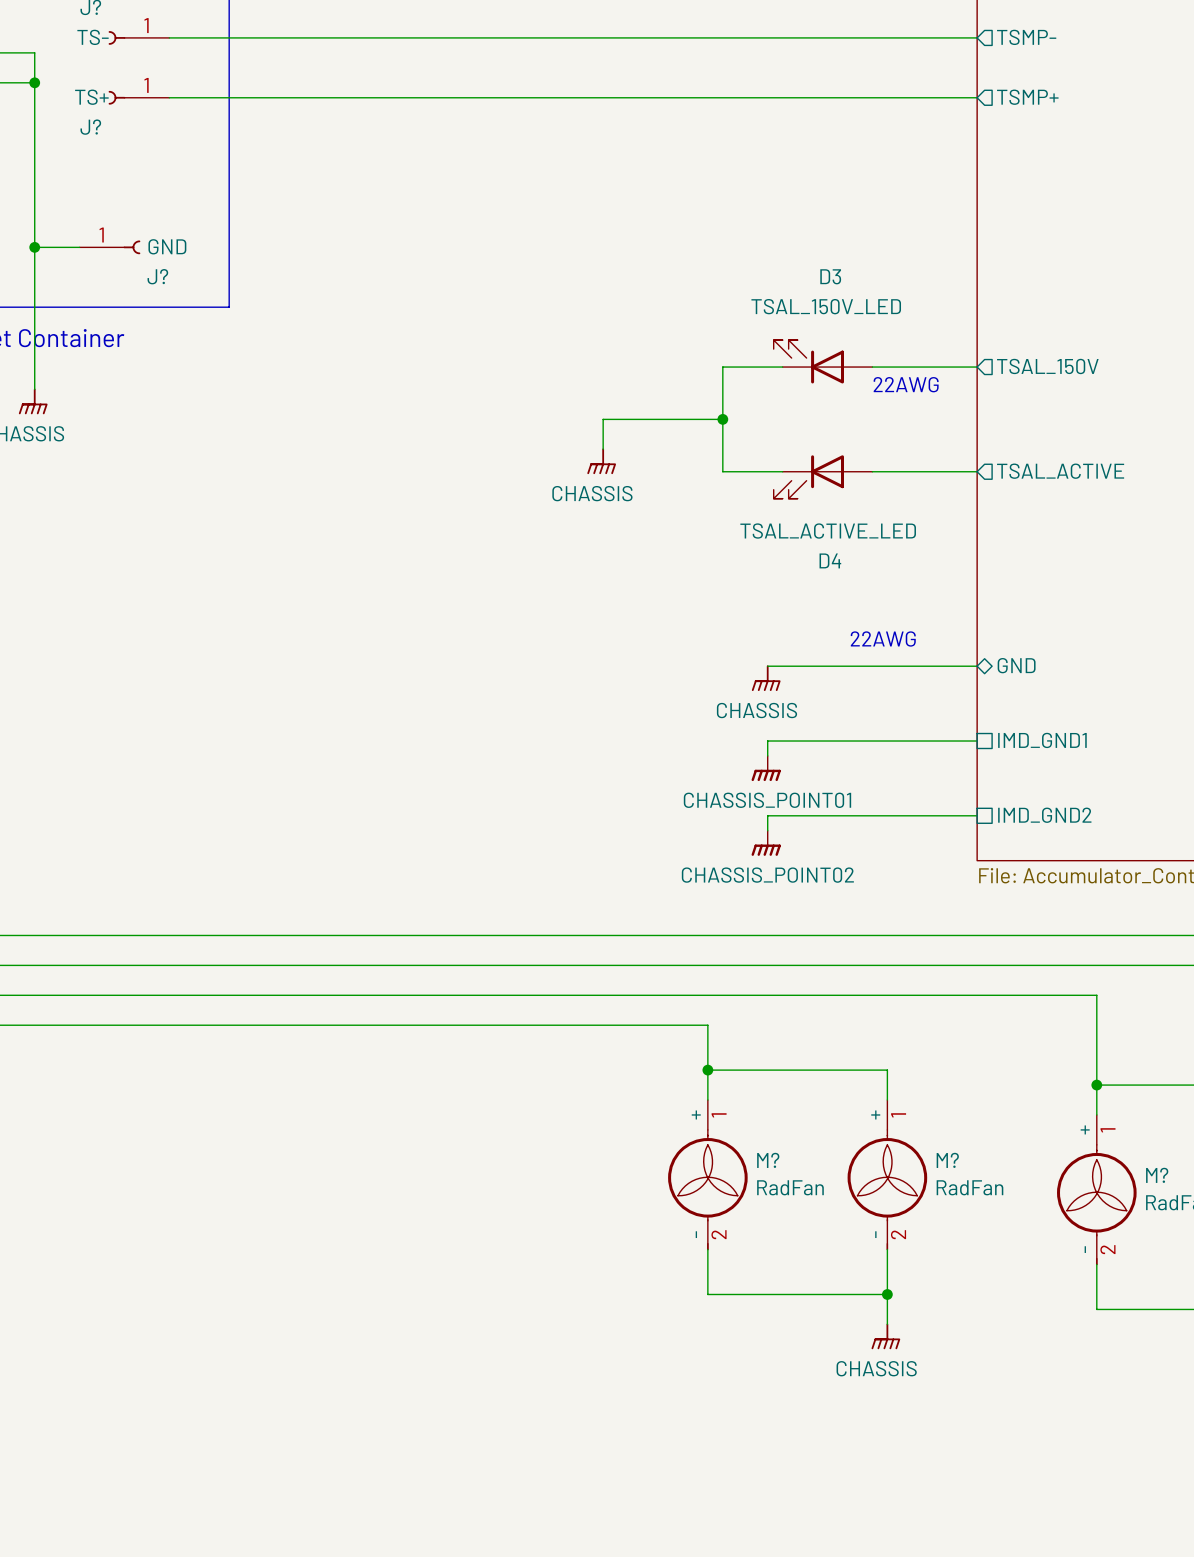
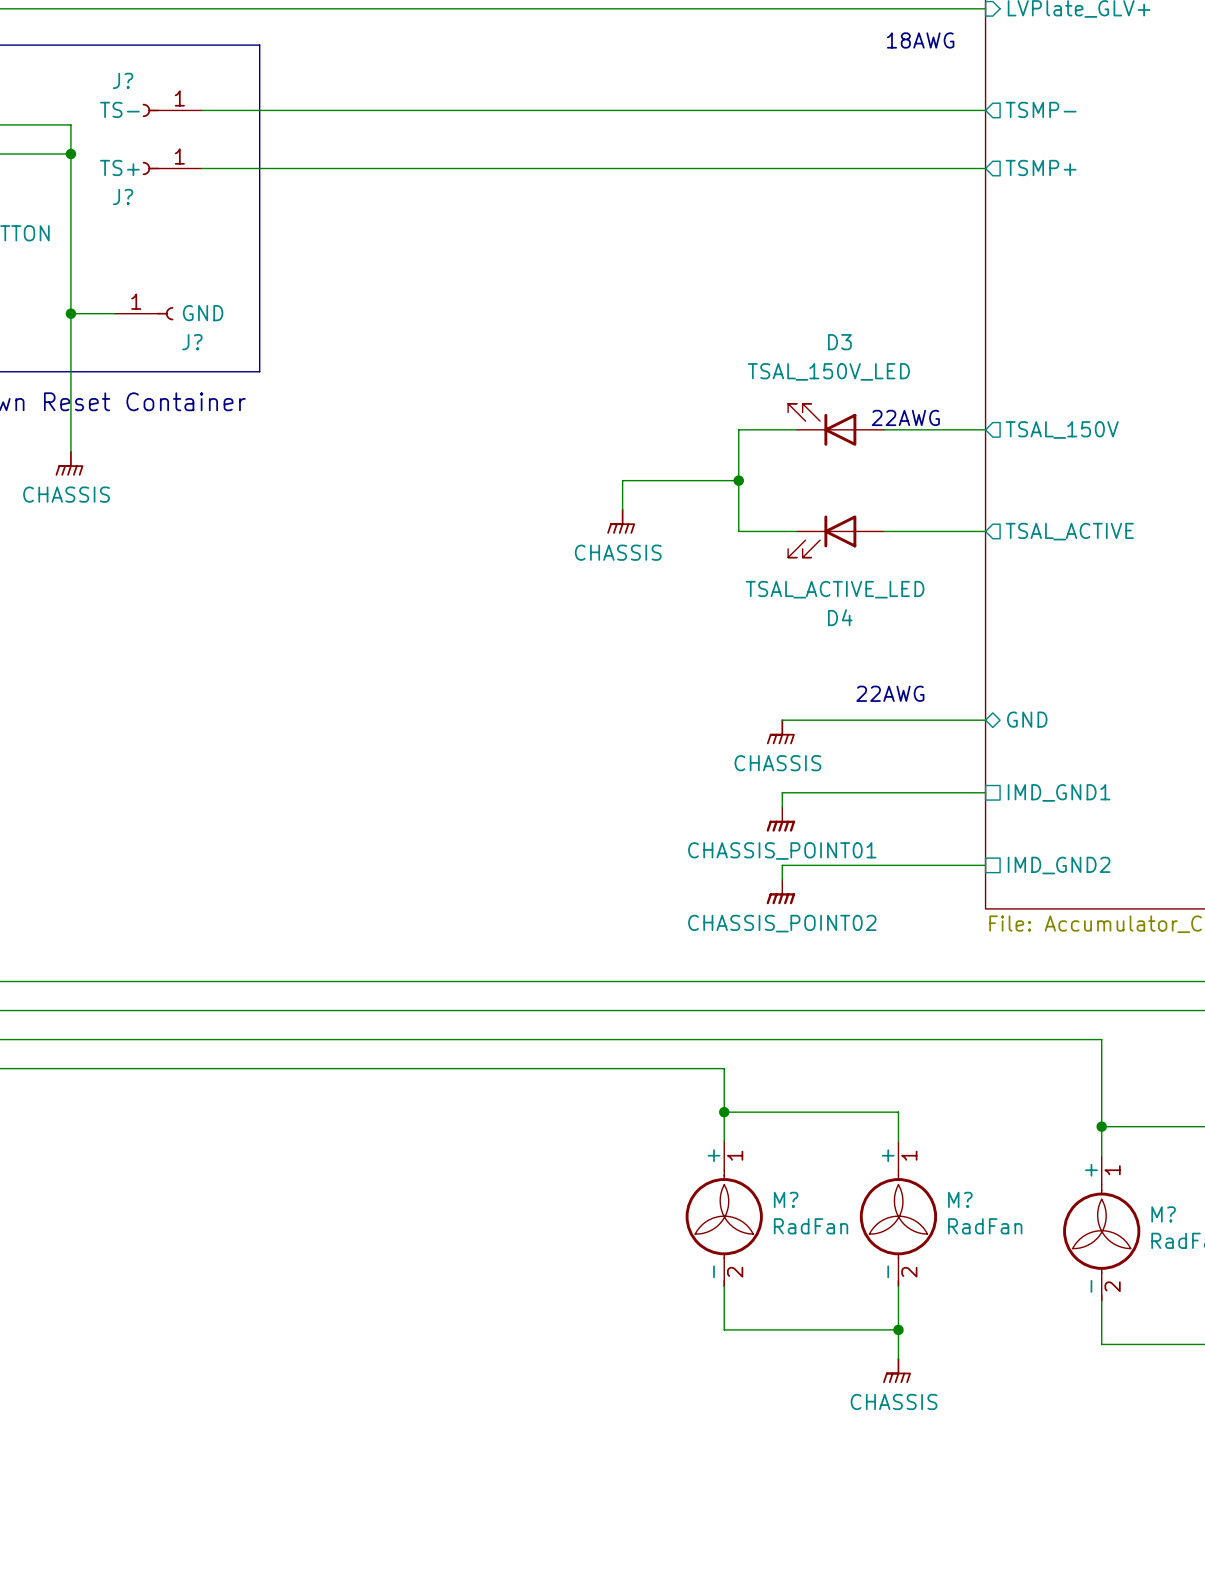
text position: 22AWG (906, 384) -> 22AWG (905, 417)

